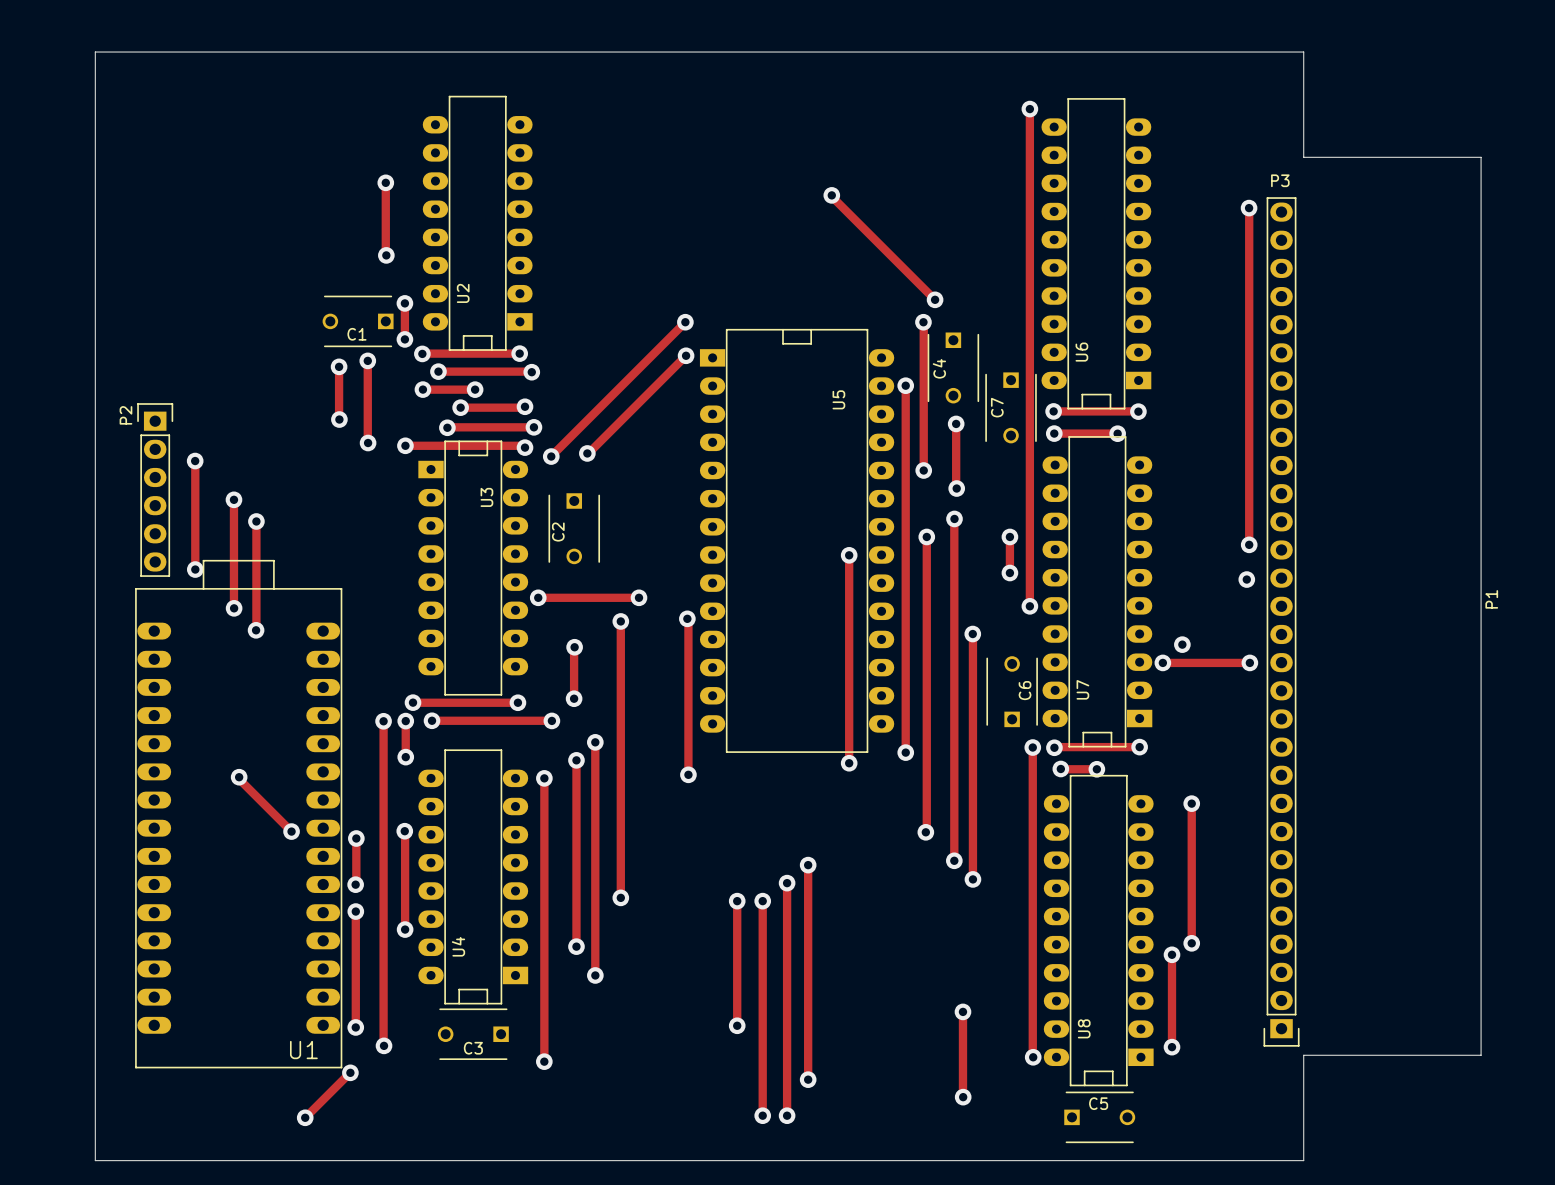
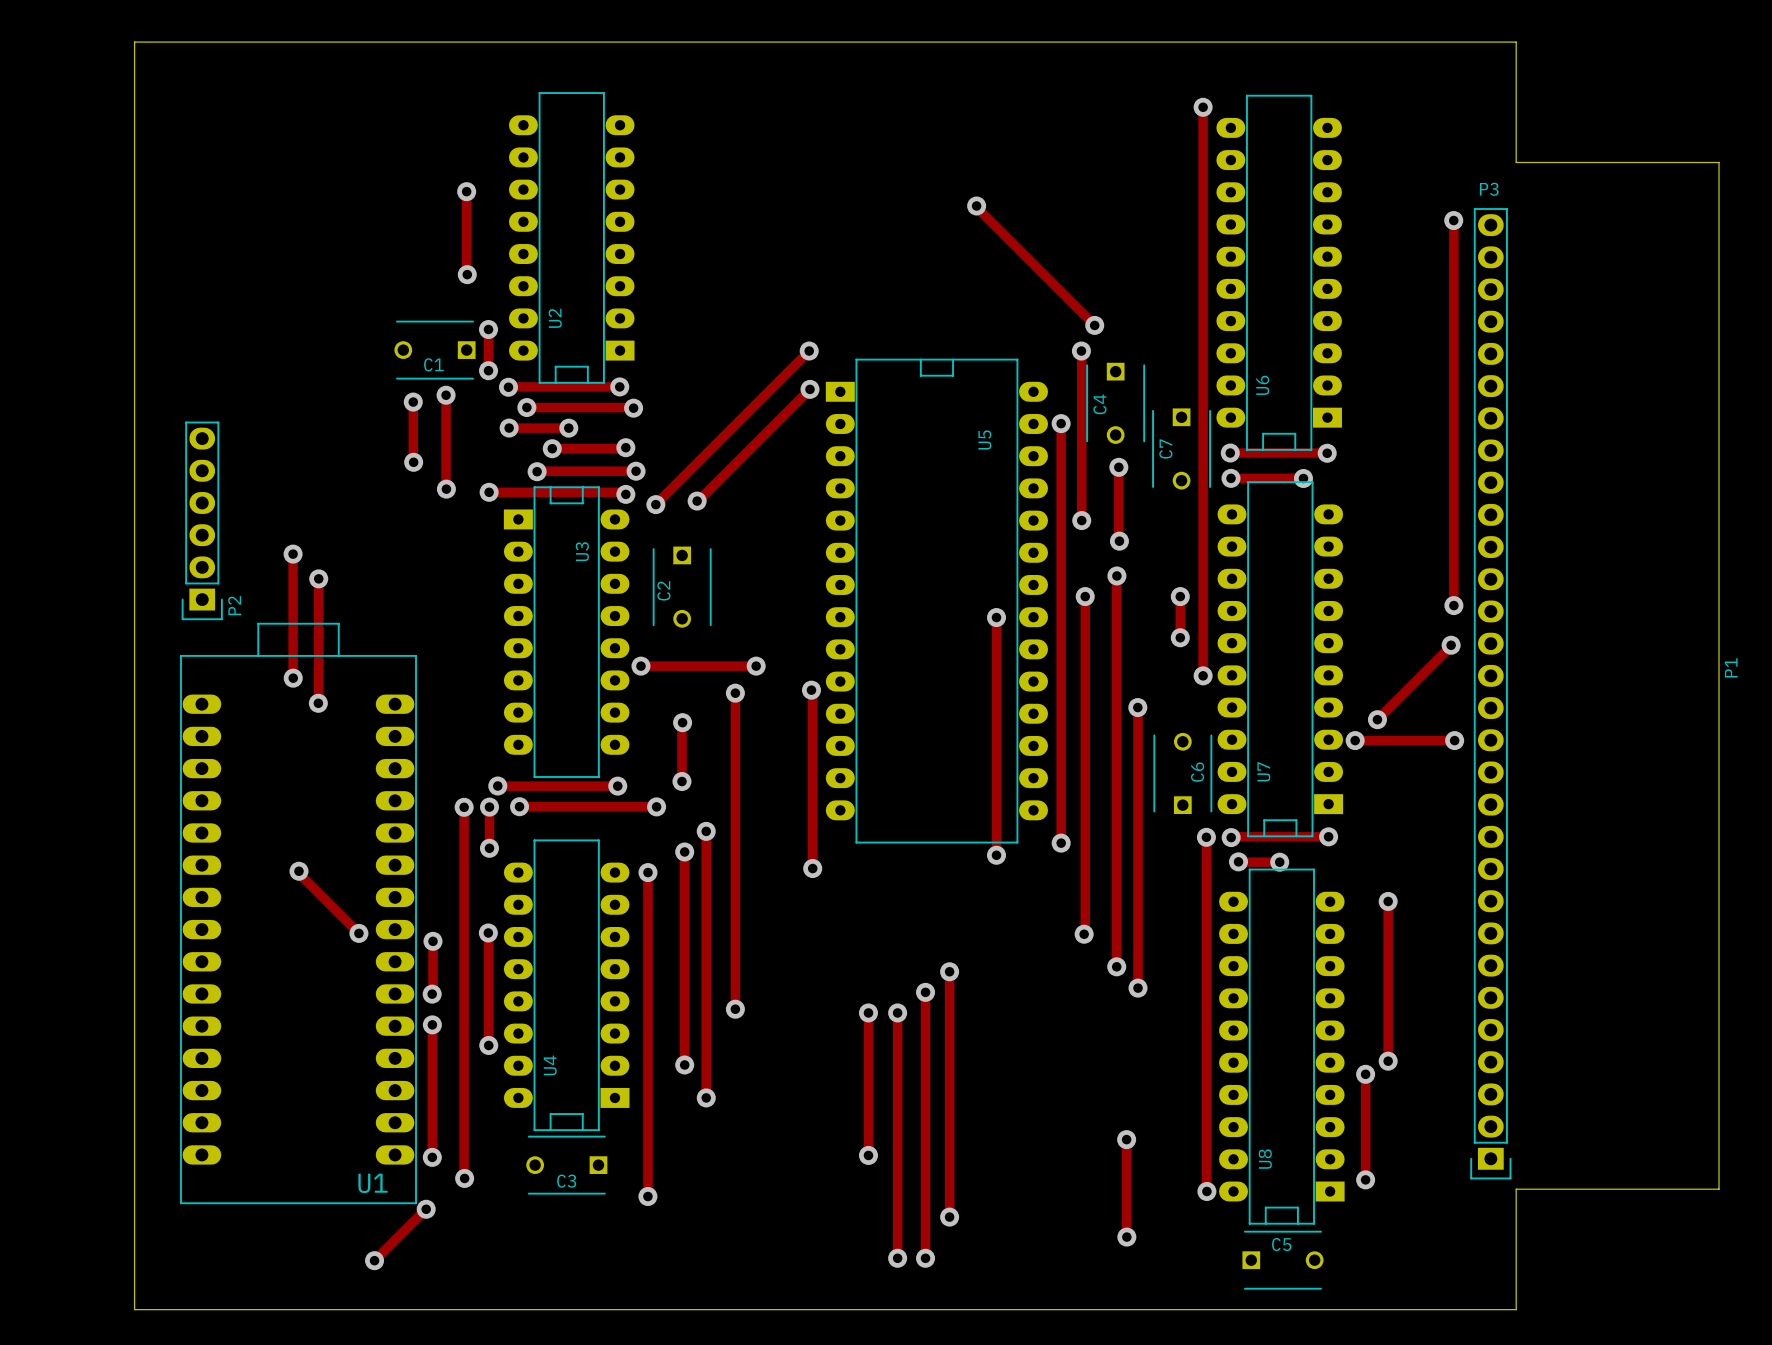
track: (195, 461) (195, 569) -> none
via: (195, 461) -> none
P2 rotation: 0° (155, 490) -> 180° (202, 520)
via: (195, 569) -> none
track: none -> (1451, 645) (1377, 719)

